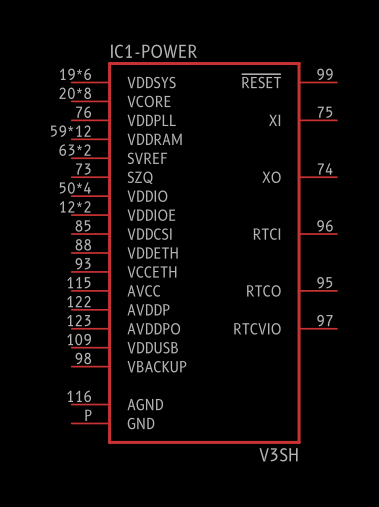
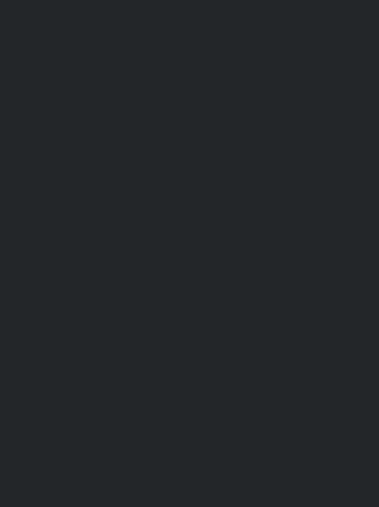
IC1-POWER: V3SH (204, 252) -> none

